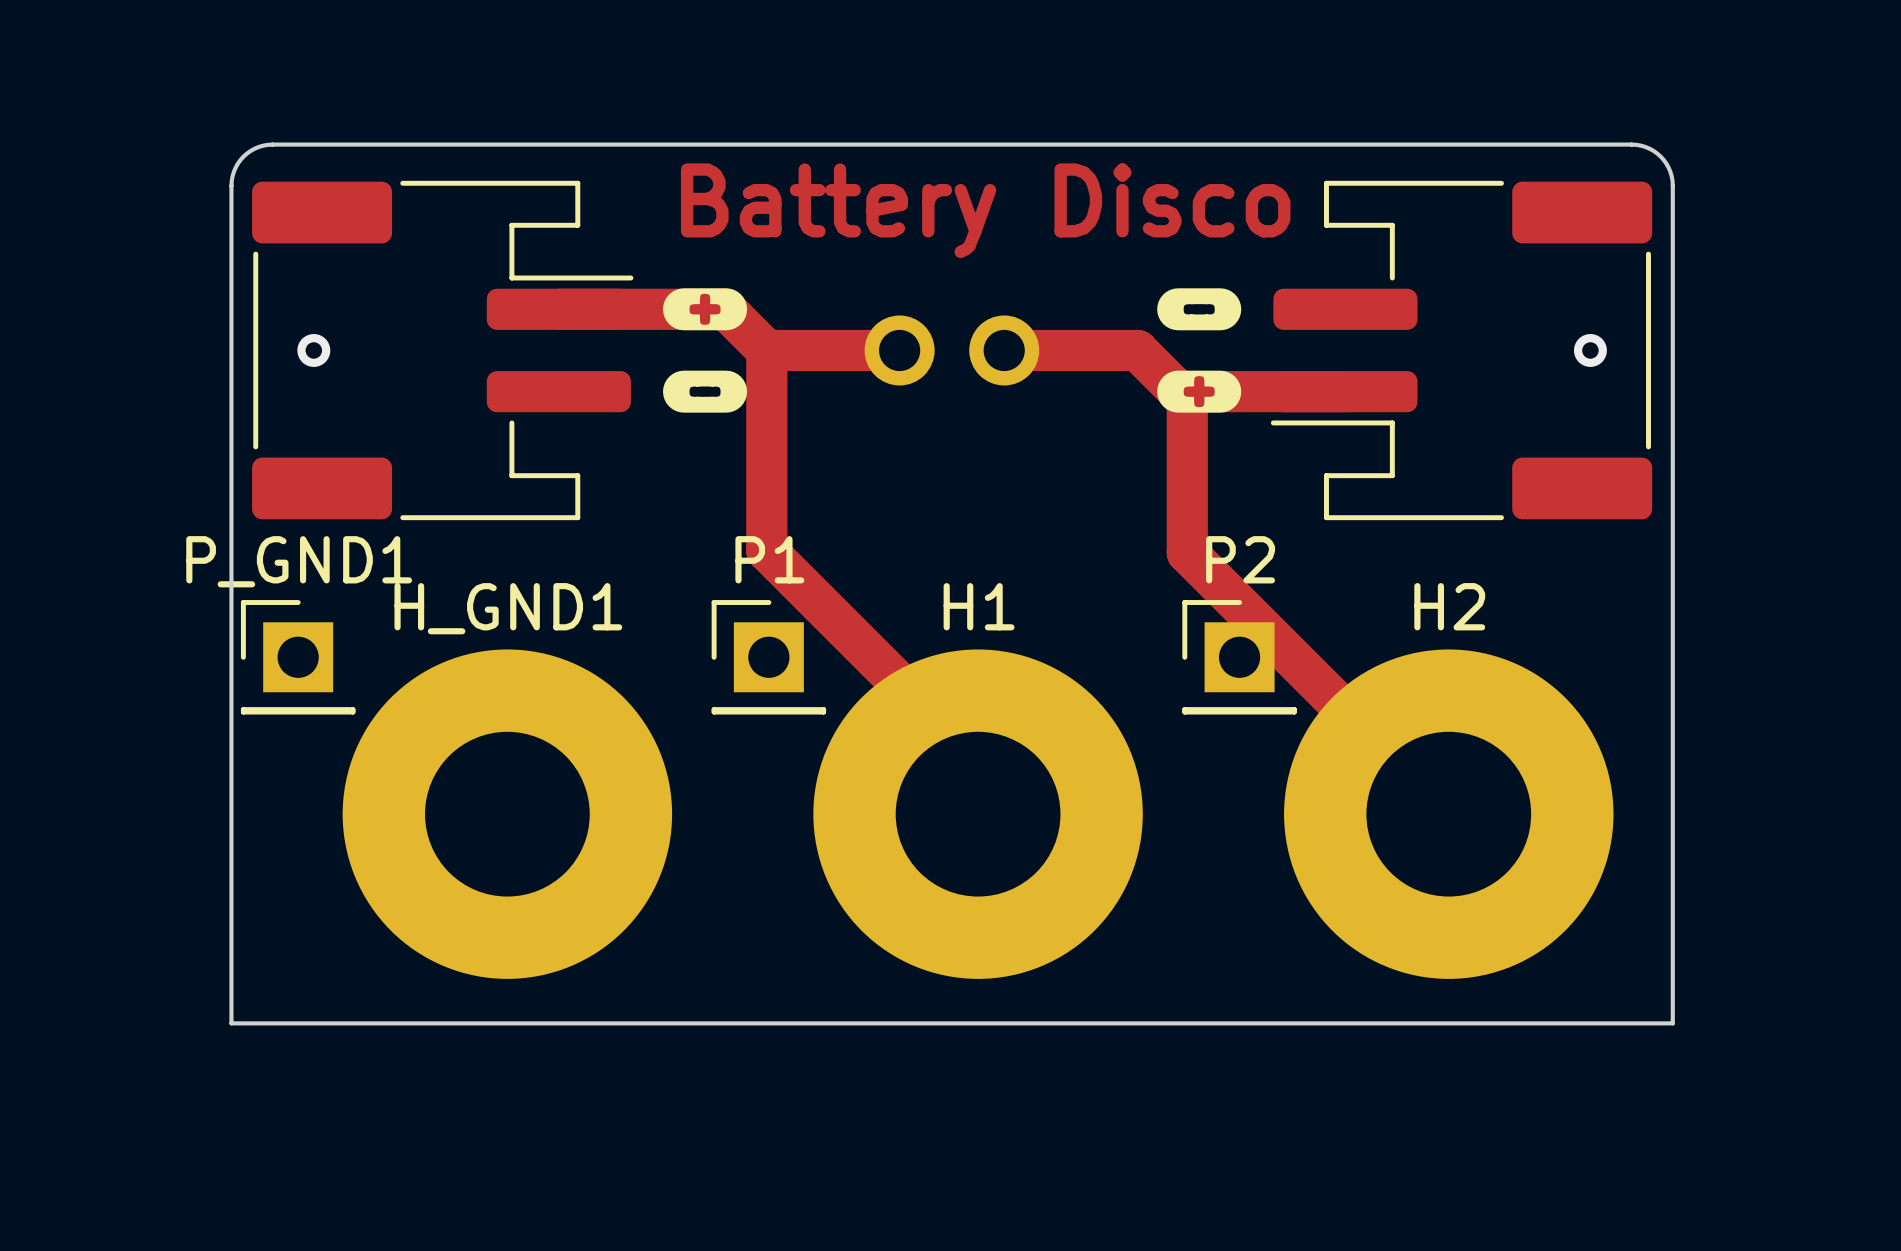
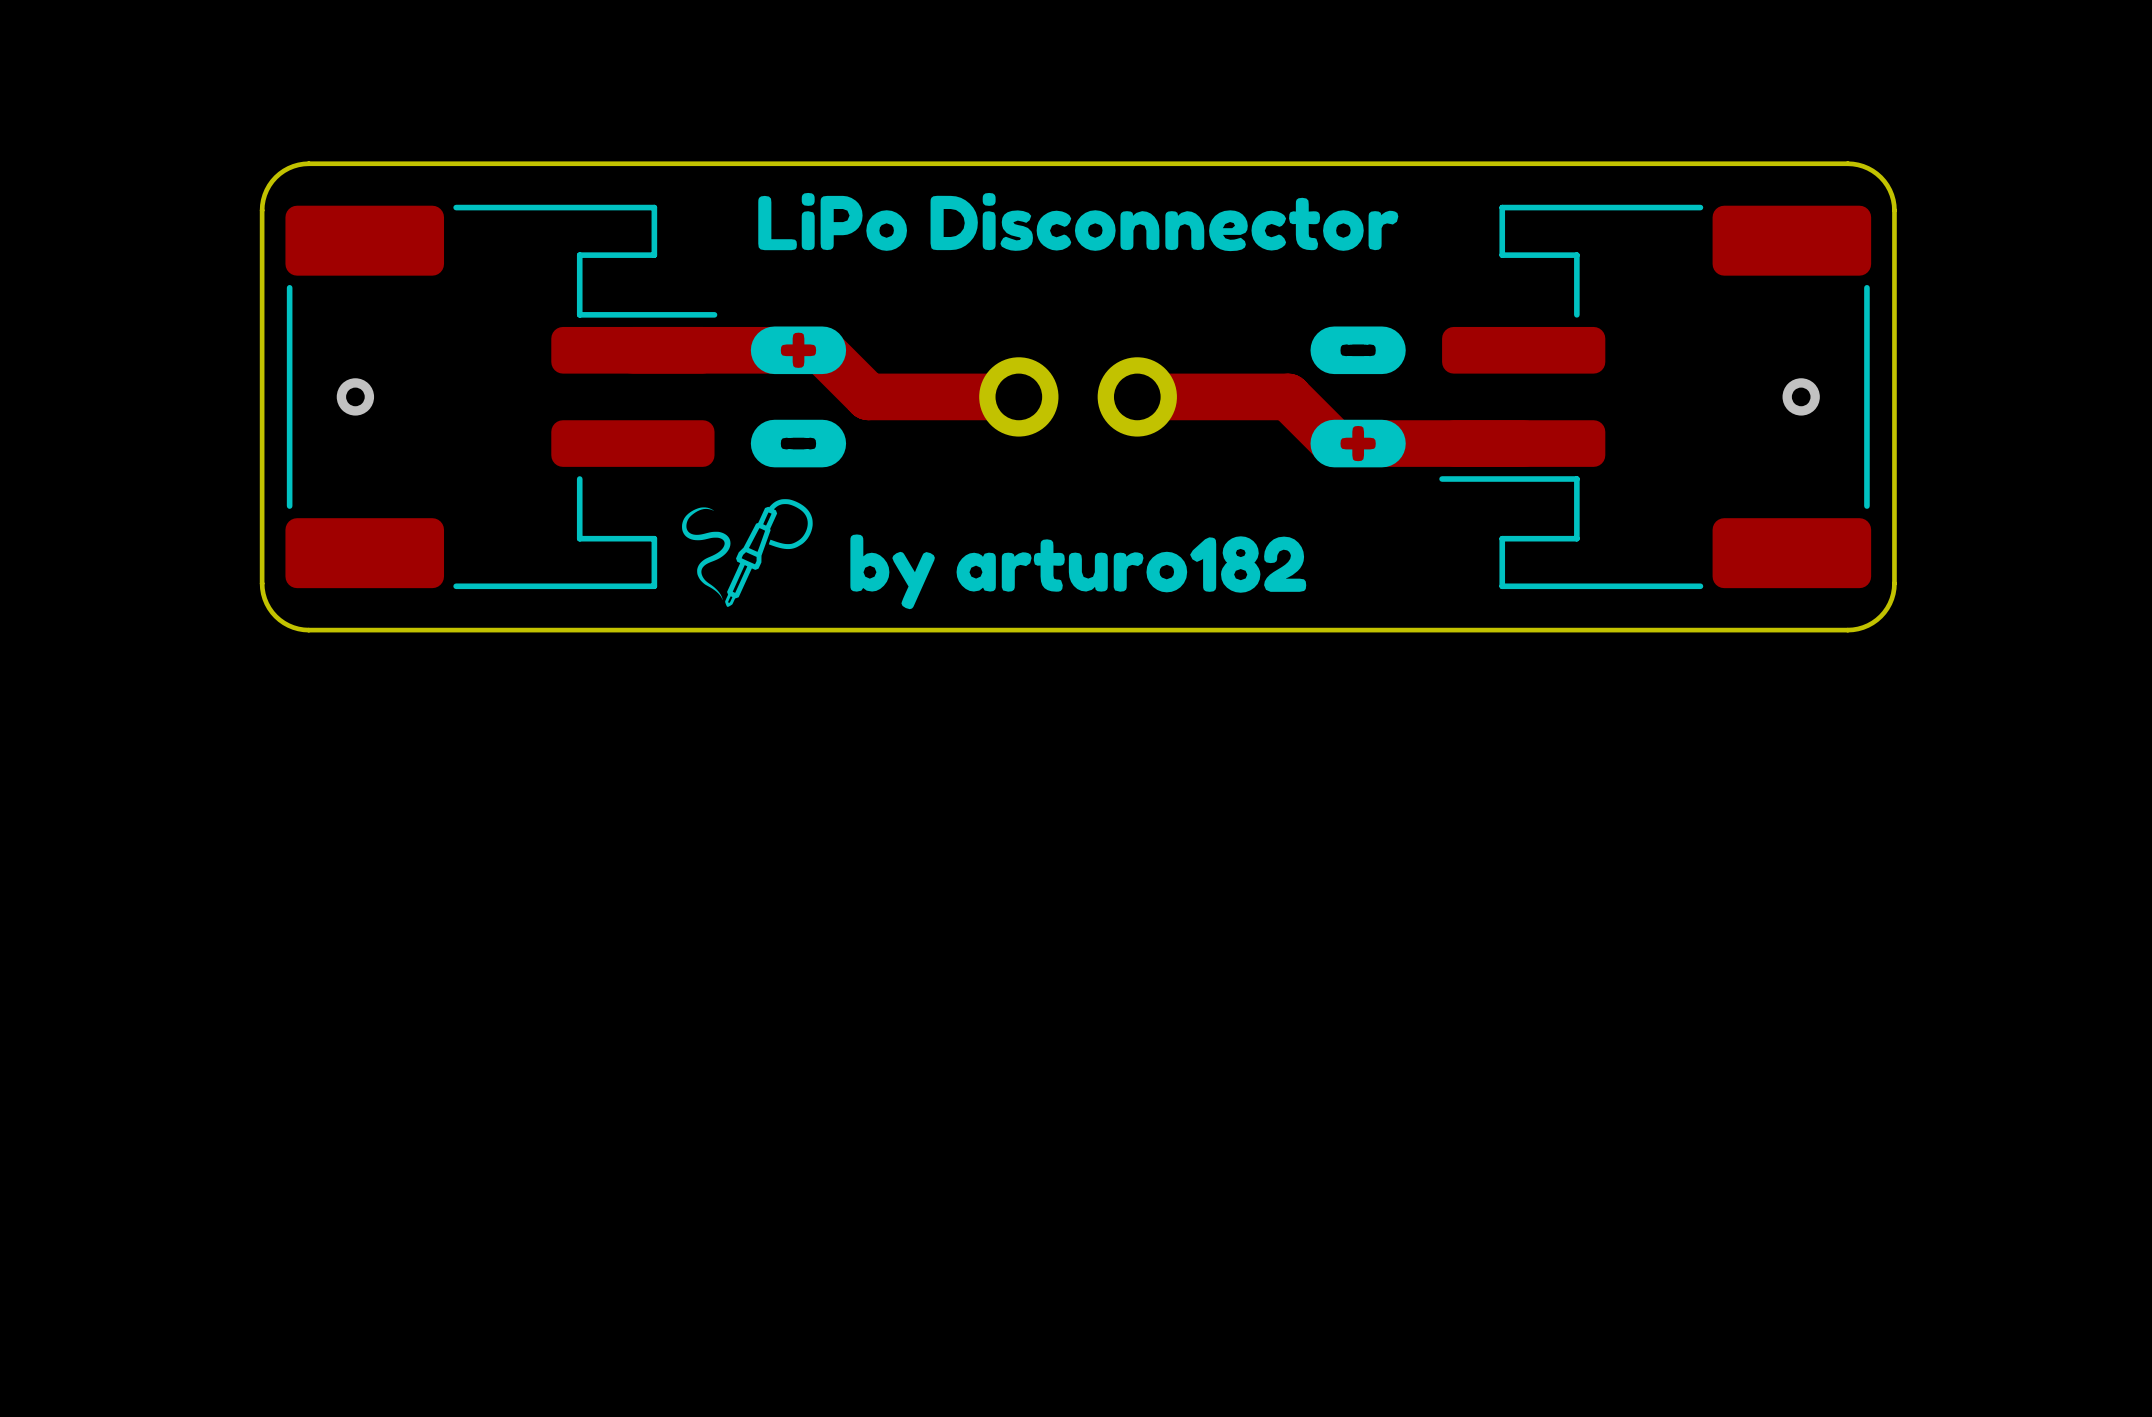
drawing: none -> [758, 192, 1399, 252]
text: Battery Disco (985, 210) -> none
top track: (766, 350) (766, 550) (978, 761) (978, 814) -> none
top track: (1187, 391) (1187, 552) (1448, 814) -> none
drawing: none -> [682, 499, 1307, 610]
board edge: (231, 515) (231, 1023) (1672, 1023) (1672, 515) -> (262, 583) (264, 598) (275, 616) (288, 625) (308, 630) (1847, 630) (1863, 627) (1880, 616) (1889, 603) (1894, 583)
P_GND1: (298, 657) -> none
P1: (768, 657) -> none
P2: (1239, 657) -> none
H_GND1: (507, 814) -> none
H1: (978, 814) -> none
H2: (1448, 814) -> none

